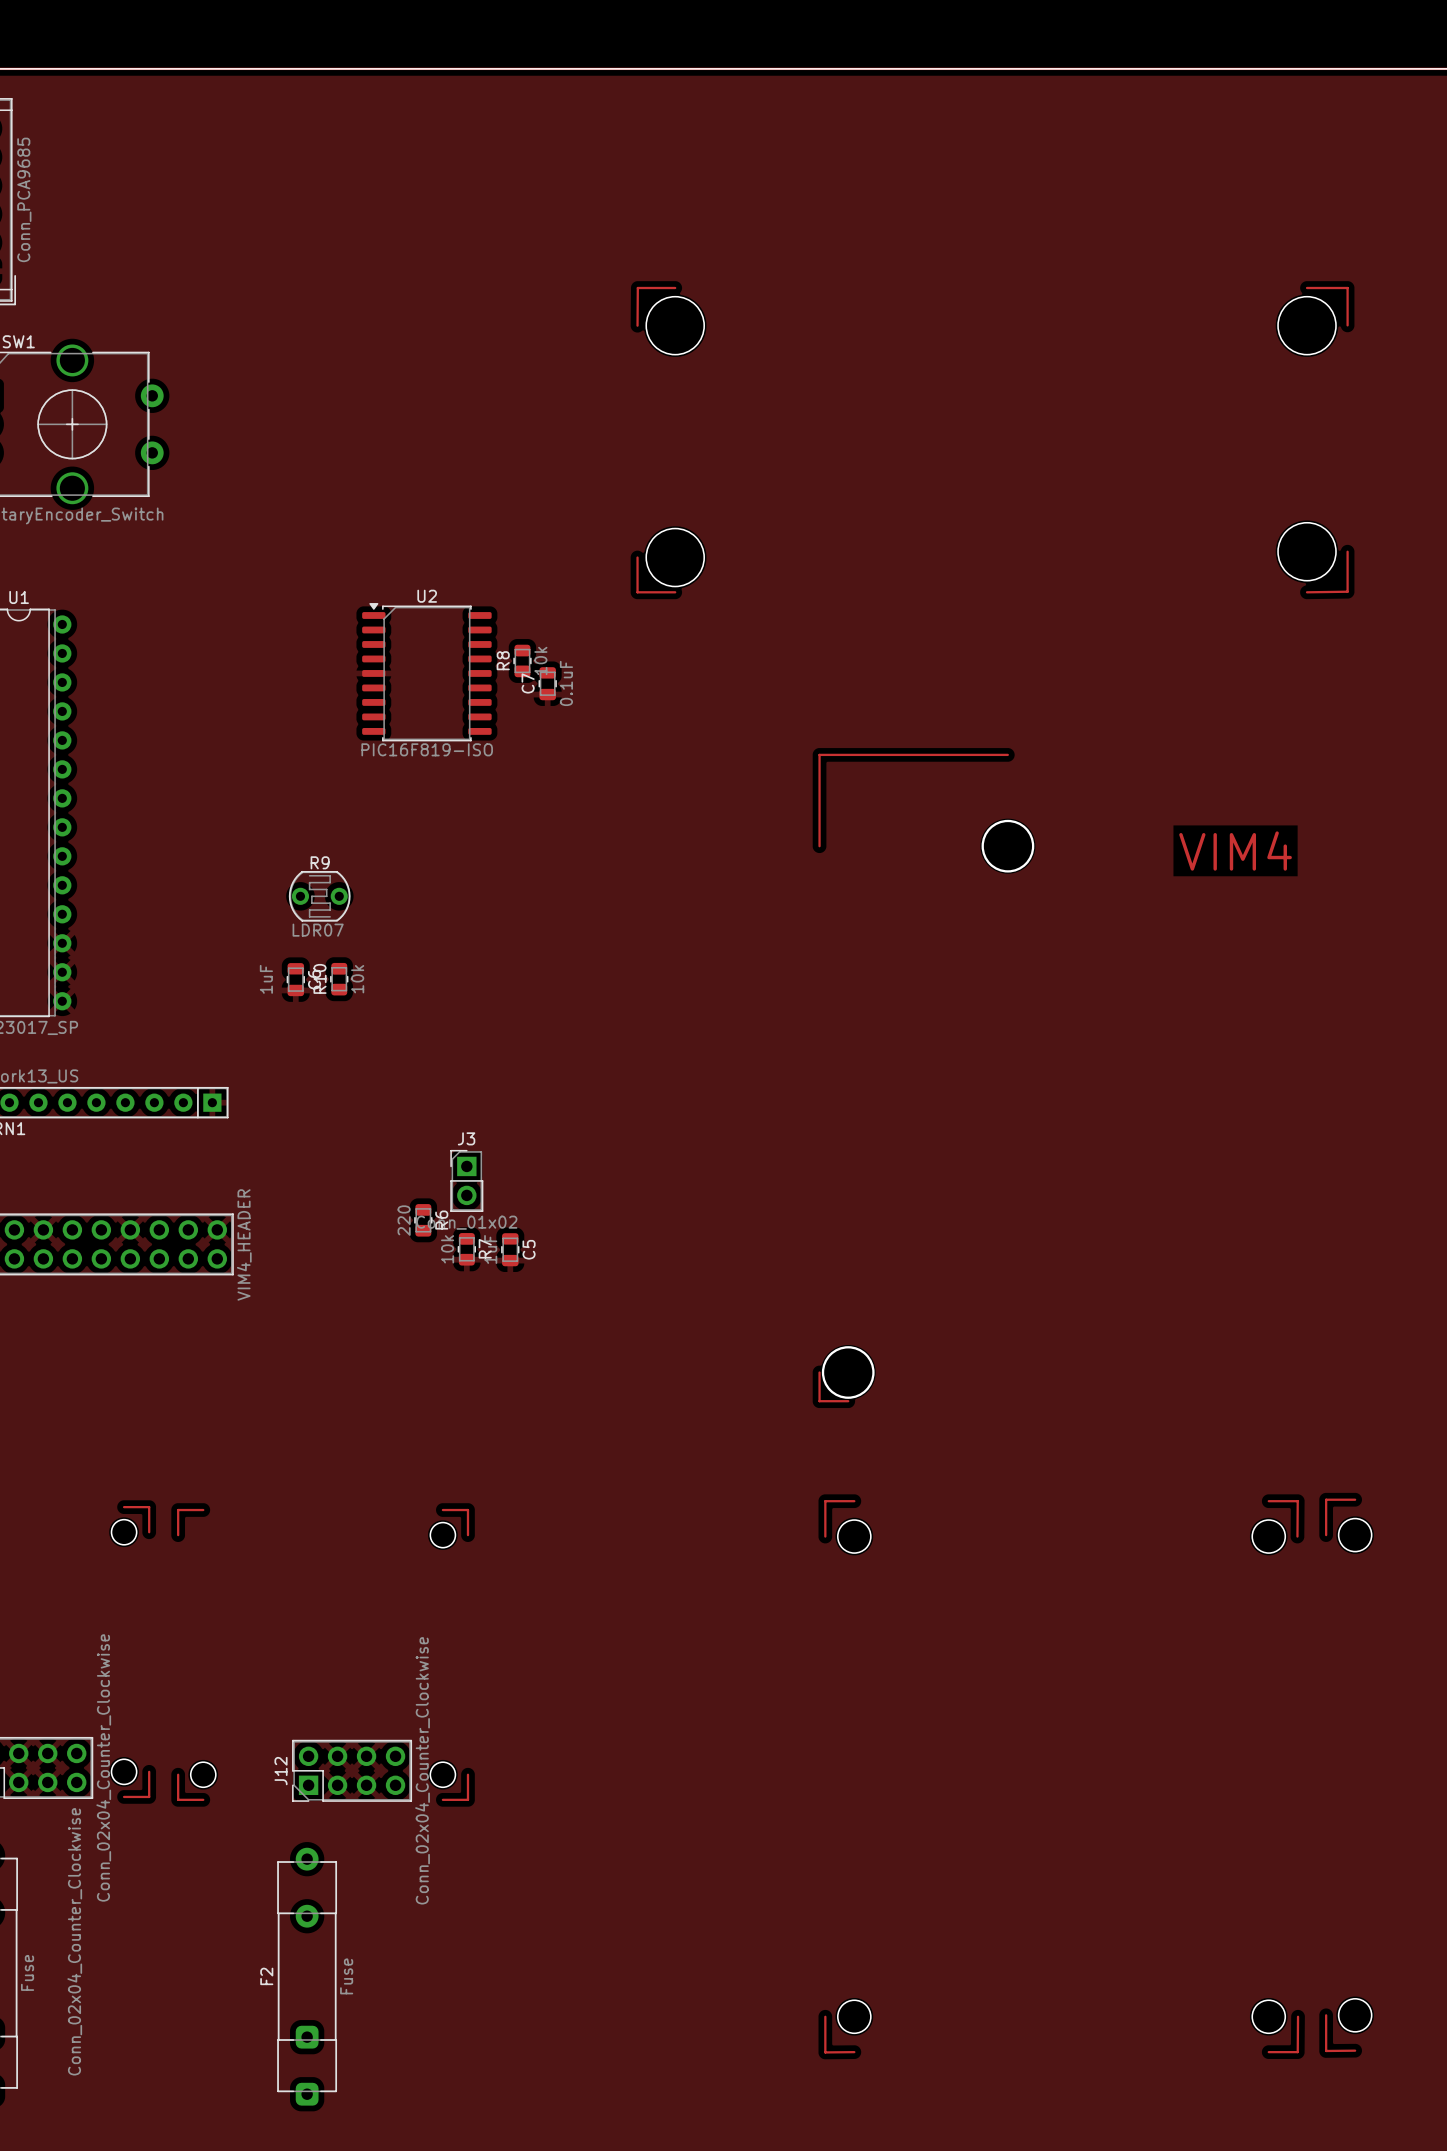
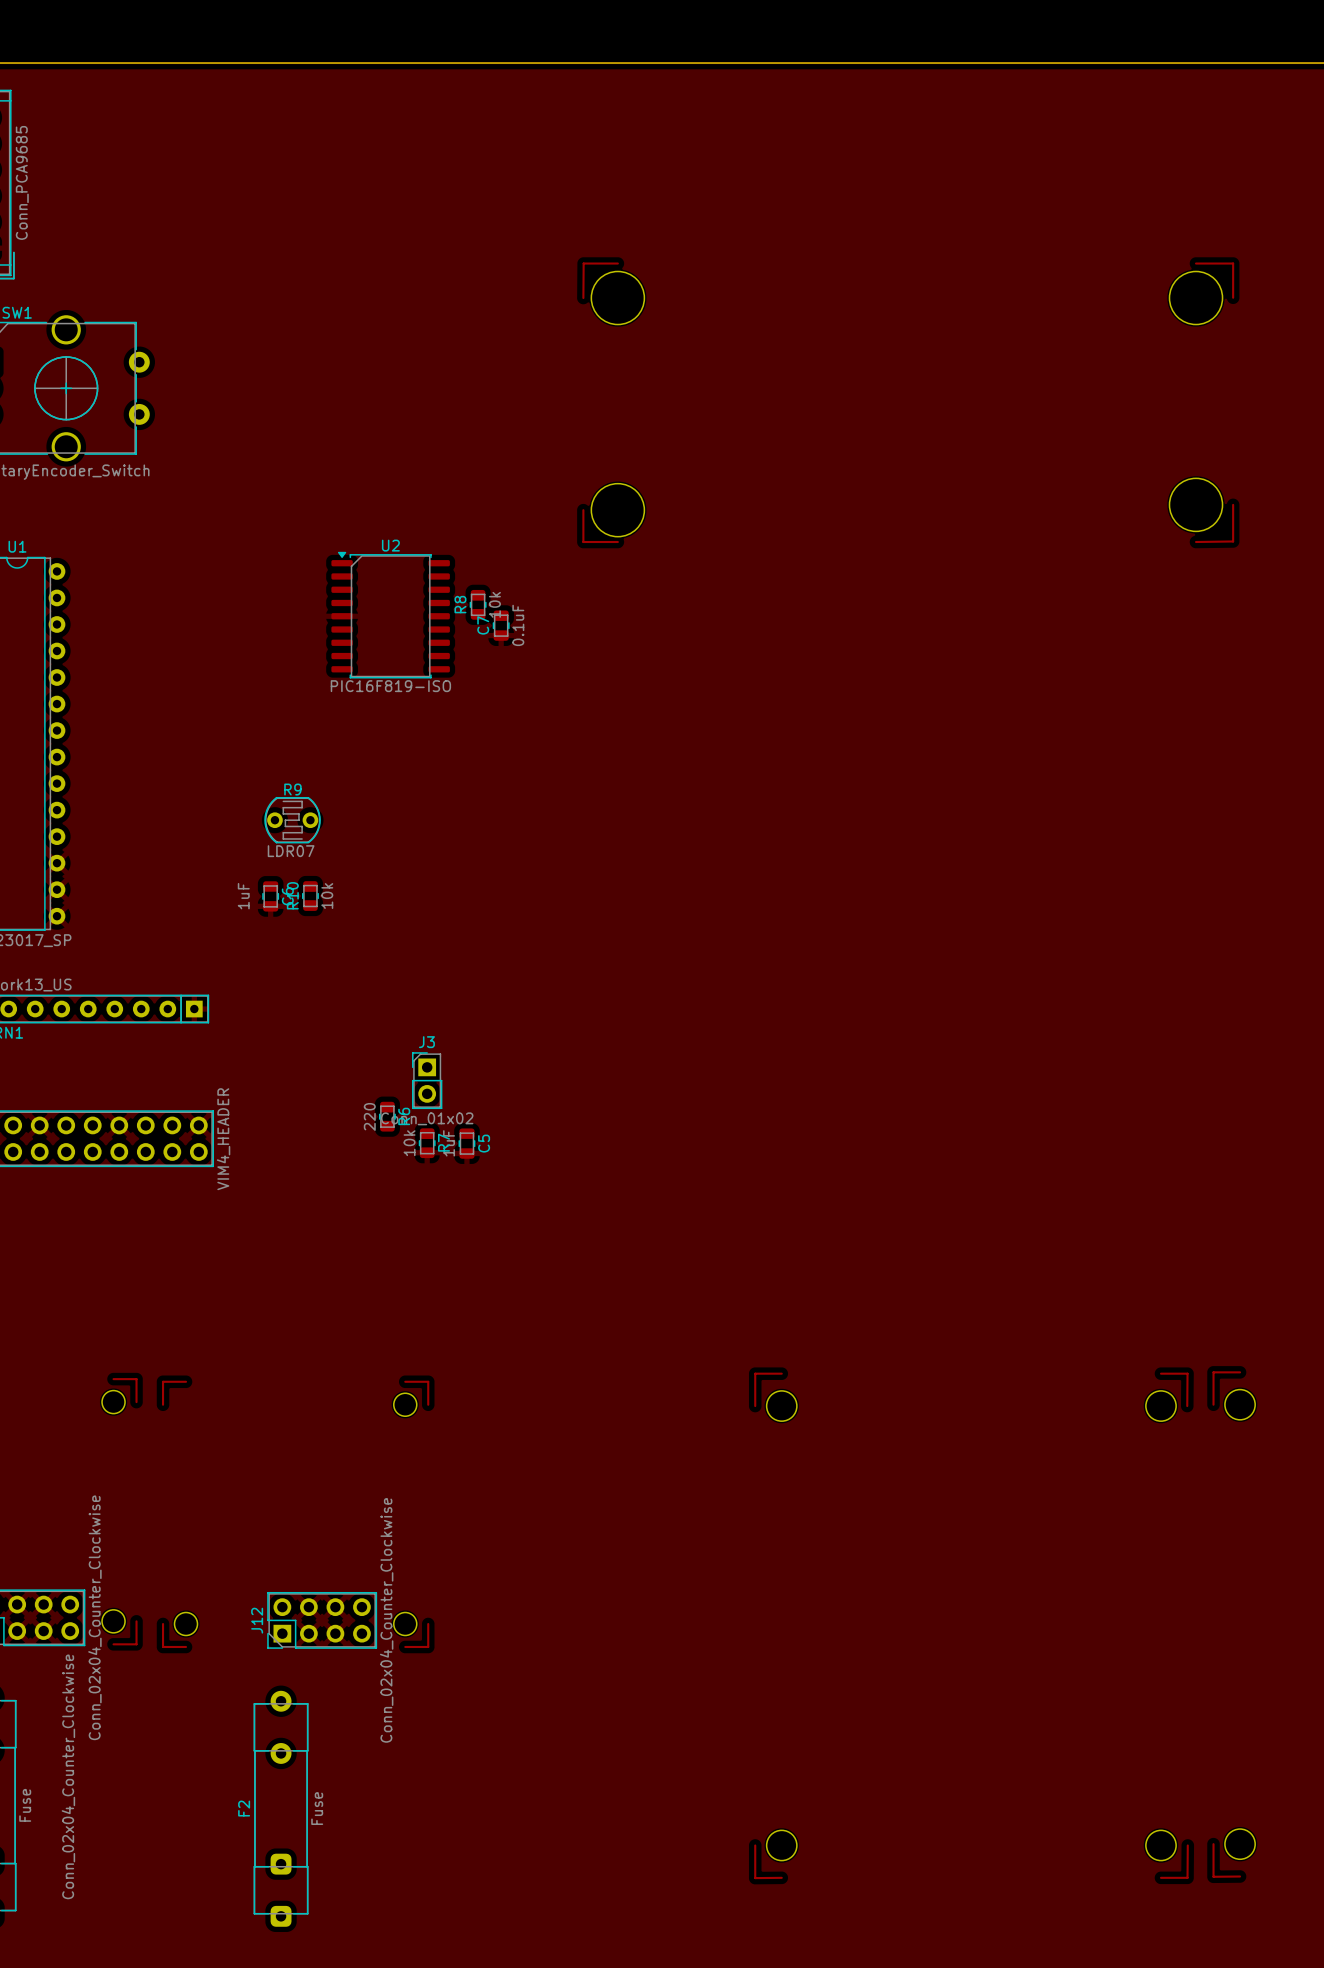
track: (1007, 754) (819, 754) (819, 846) -> none
round board edge: [981, 819, 1035, 873] -> none
text: VIM4 (1235, 851) -> none
round board edge: [821, 1346, 875, 1399] -> none
track: (819, 1372) (819, 1401) (848, 1401) -> none

